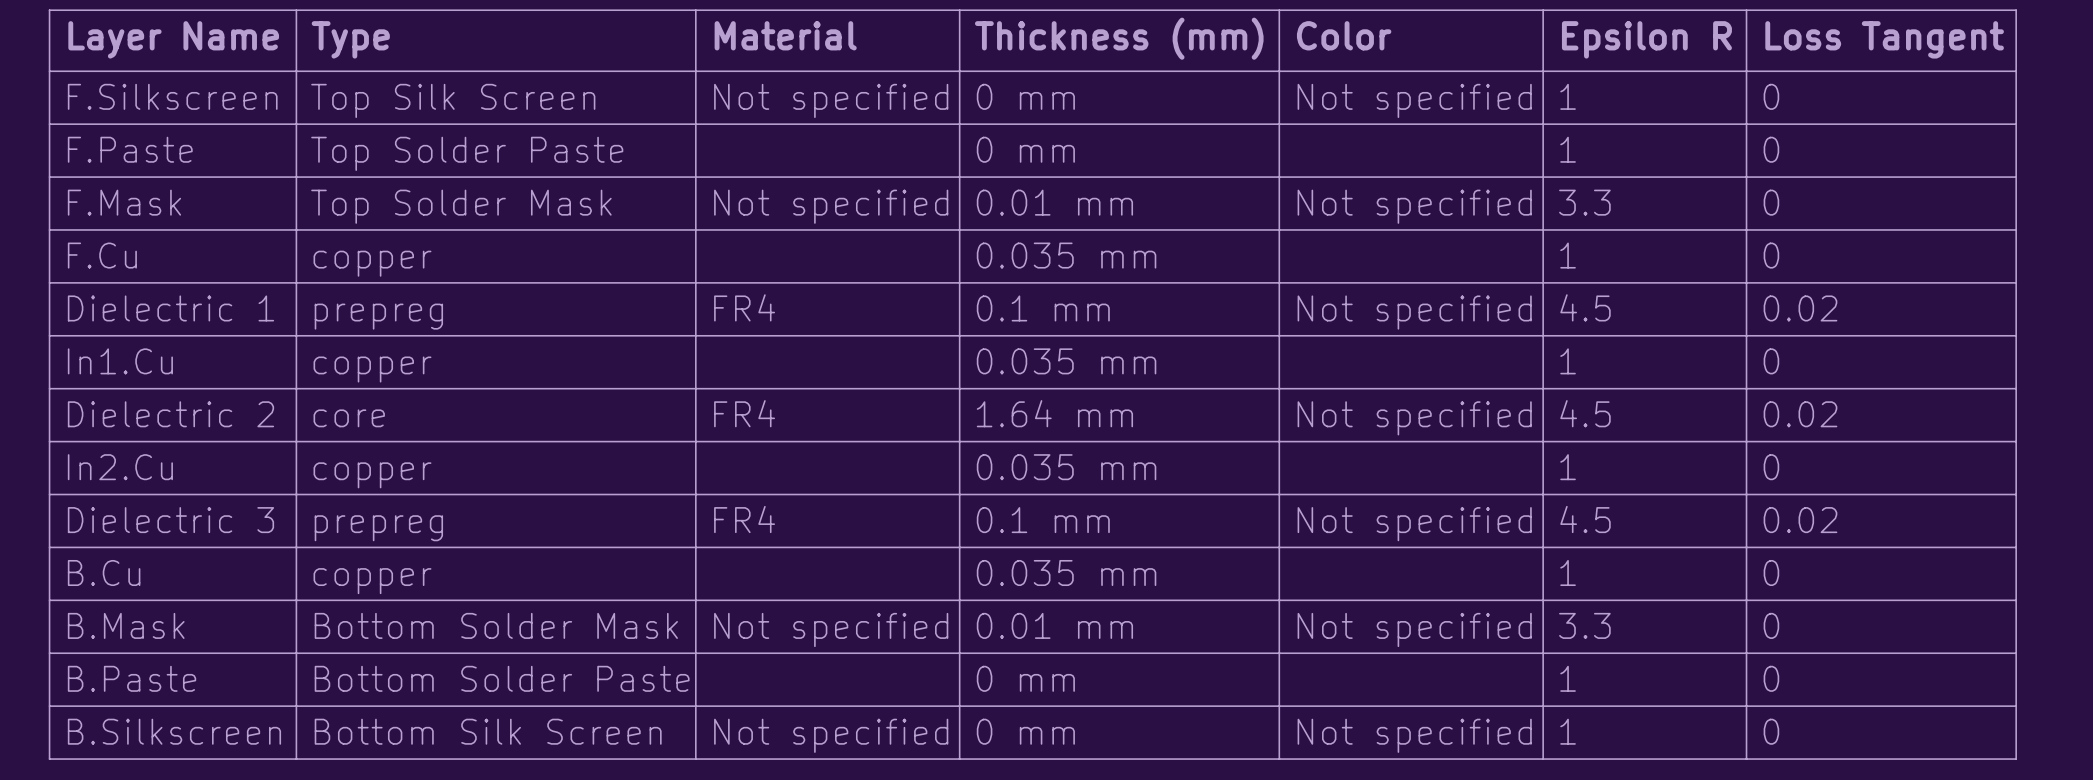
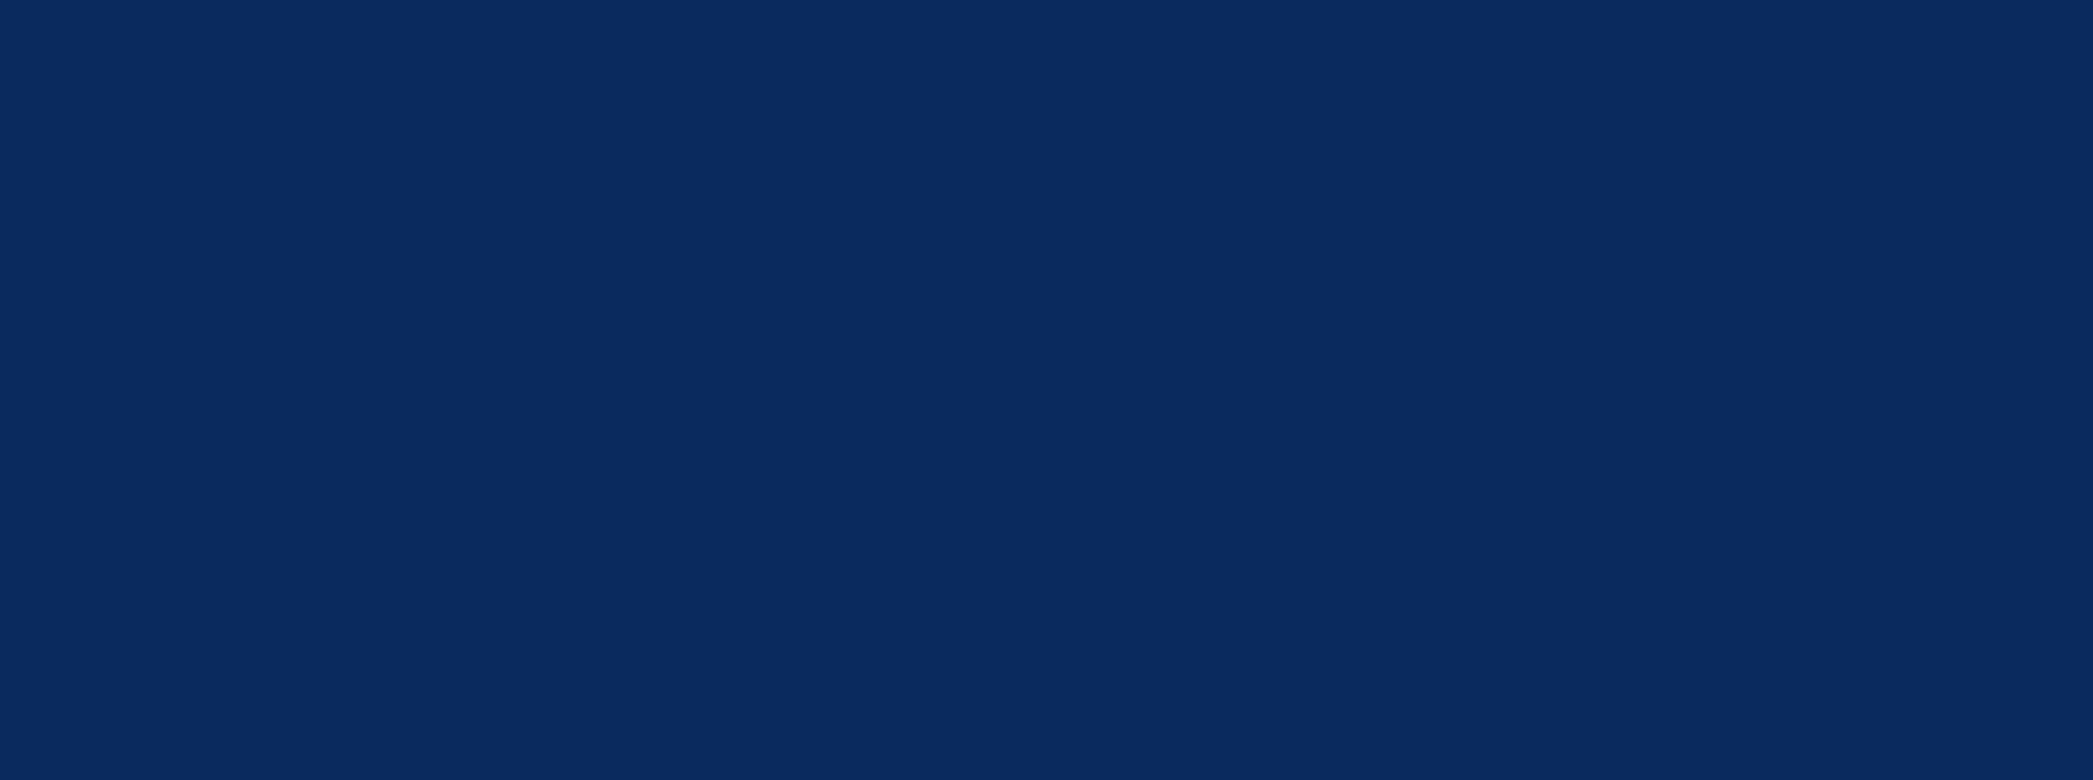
line: (49, 10) (2016, 10) (2016, 759) (49, 759) (49, 10) -> none
line: (296, 10) (296, 759) -> none
line: (695, 10) (695, 759) -> none
line: (959, 10) (959, 759) -> none
line: (1279, 10) (1279, 759) -> none
line: (1543, 10) (1543, 759) -> none
line: (1746, 10) (1746, 759) -> none
text: Material (785, 35) -> none
text: Color (1344, 35) -> none
text: Thickness (mm) (1119, 38) -> none
text: Layer Name (173, 39) -> none
text: Type (350, 39) -> none
text: Epsilon R (1646, 39) -> none
text: Loss Tangent (1884, 39) -> none
line: (49, 71) (2016, 71) -> none
text: F.Silkscreen (172, 96) -> none
text: 0 mm (1025, 96) -> none
text: 1 (1568, 96) -> none
text: 0 (1771, 96) -> none
text: Top Silk Screen (453, 100) -> none
text: Not specified (831, 100) -> none
text: Not specified (1414, 100) -> none
line: (49, 124) (2016, 124) -> none
text: F.Paste (130, 149) -> none
text: 0 mm (1025, 149) -> none
text: 1 (1568, 149) -> none
text: 0 (1771, 149) -> none
text: Top Solder Paste (467, 153) -> none
line: (49, 177) (2016, 177) -> none
text: F.Mask (124, 202) -> none
text: 0.01 mm (1054, 202) -> none
text: 3.3 (1584, 202) -> none
text: 0 (1771, 202) -> none
text: Top Solder Mask (461, 206) -> none
text: Not specified (831, 206) -> none
text: Not specified (1414, 206) -> none
line: (49, 229) (2016, 229) -> none
text: F.Cu (102, 255) -> none
text: 0.035 mm (1066, 255) -> none
text: 1 (1568, 255) -> none
text: 0 (1771, 255) -> none
text: copper (372, 263) -> none
line: (49, 282) (2016, 282) -> none
text: FR4 (744, 307) -> none
text: 4.5 (1585, 307) -> none
text: Dielectric 1 (170, 308) -> none
text: 0.1 mm (1043, 308) -> none
text: 0.02 (1800, 308) -> none
text: Not specified (1414, 312) -> none
text: prepreg (378, 316) -> none
line: (49, 335) (2016, 335) -> none
text: In1.Cu (120, 361) -> none
text: 0.035 mm (1066, 361) -> none
text: 1 (1568, 361) -> none
text: 0 (1771, 361) -> none
text: copper (372, 369) -> none
line: (49, 388) (2016, 388) -> none
text: FR4 (744, 413) -> none
text: 1.64 mm (1054, 413) -> none
text: 4.5 (1585, 413) -> none
text: Dielectric 2 (170, 414) -> none
text: 0.02 (1800, 414) -> none
text: core (349, 418) -> none
text: Not specified (1414, 418) -> none
line: (49, 441) (2016, 441) -> none
text: In2.Cu (120, 467) -> none
text: 0.035 mm (1066, 467) -> none
text: 1 (1568, 467) -> none
text: 0 (1771, 467) -> none
text: copper (372, 475) -> none
line: (49, 494) (2016, 494) -> none
text: FR4 (744, 519) -> none
text: 4.5 (1585, 519) -> none
text: Dielectric 3 (170, 520) -> none
text: 0.1 mm (1043, 520) -> none
text: 0.02 (1800, 520) -> none
text: Not specified (1414, 524) -> none
text: prepreg (378, 528) -> none
line: (49, 547) (2016, 547) -> none
text: B.Cu (104, 573) -> none
text: 0.035 mm (1066, 573) -> none
text: 1 (1568, 573) -> none
text: 0 (1771, 573) -> none
text: copper (372, 581) -> none
line: (49, 600) (2016, 600) -> none
text: B.Mask (126, 625) -> none
text: Bottom Solder Mask (496, 625) -> none
text: 0.01 mm (1054, 625) -> none
text: 3.3 (1584, 625) -> none
text: 0 (1771, 625) -> none
text: Not specified (831, 629) -> none
text: Not specified (1414, 629) -> none
line: (49, 653) (2016, 653) -> none
text: B.Paste (132, 678) -> none
text: Bottom Solder Paste (502, 678) -> none
text: 0 mm (1025, 678) -> none
text: 1 (1568, 678) -> none
text: 0 (1771, 678) -> none
line: (49, 706) (2016, 706) -> none
text: B.Silkscreen (174, 731) -> none
text: Bottom Silk Screen (488, 731) -> none
text: 0 mm (1025, 731) -> none
text: 1 (1568, 731) -> none
text: 0 (1771, 731) -> none
text: Not specified (831, 735) -> none
text: Not specified (1414, 735) -> none

